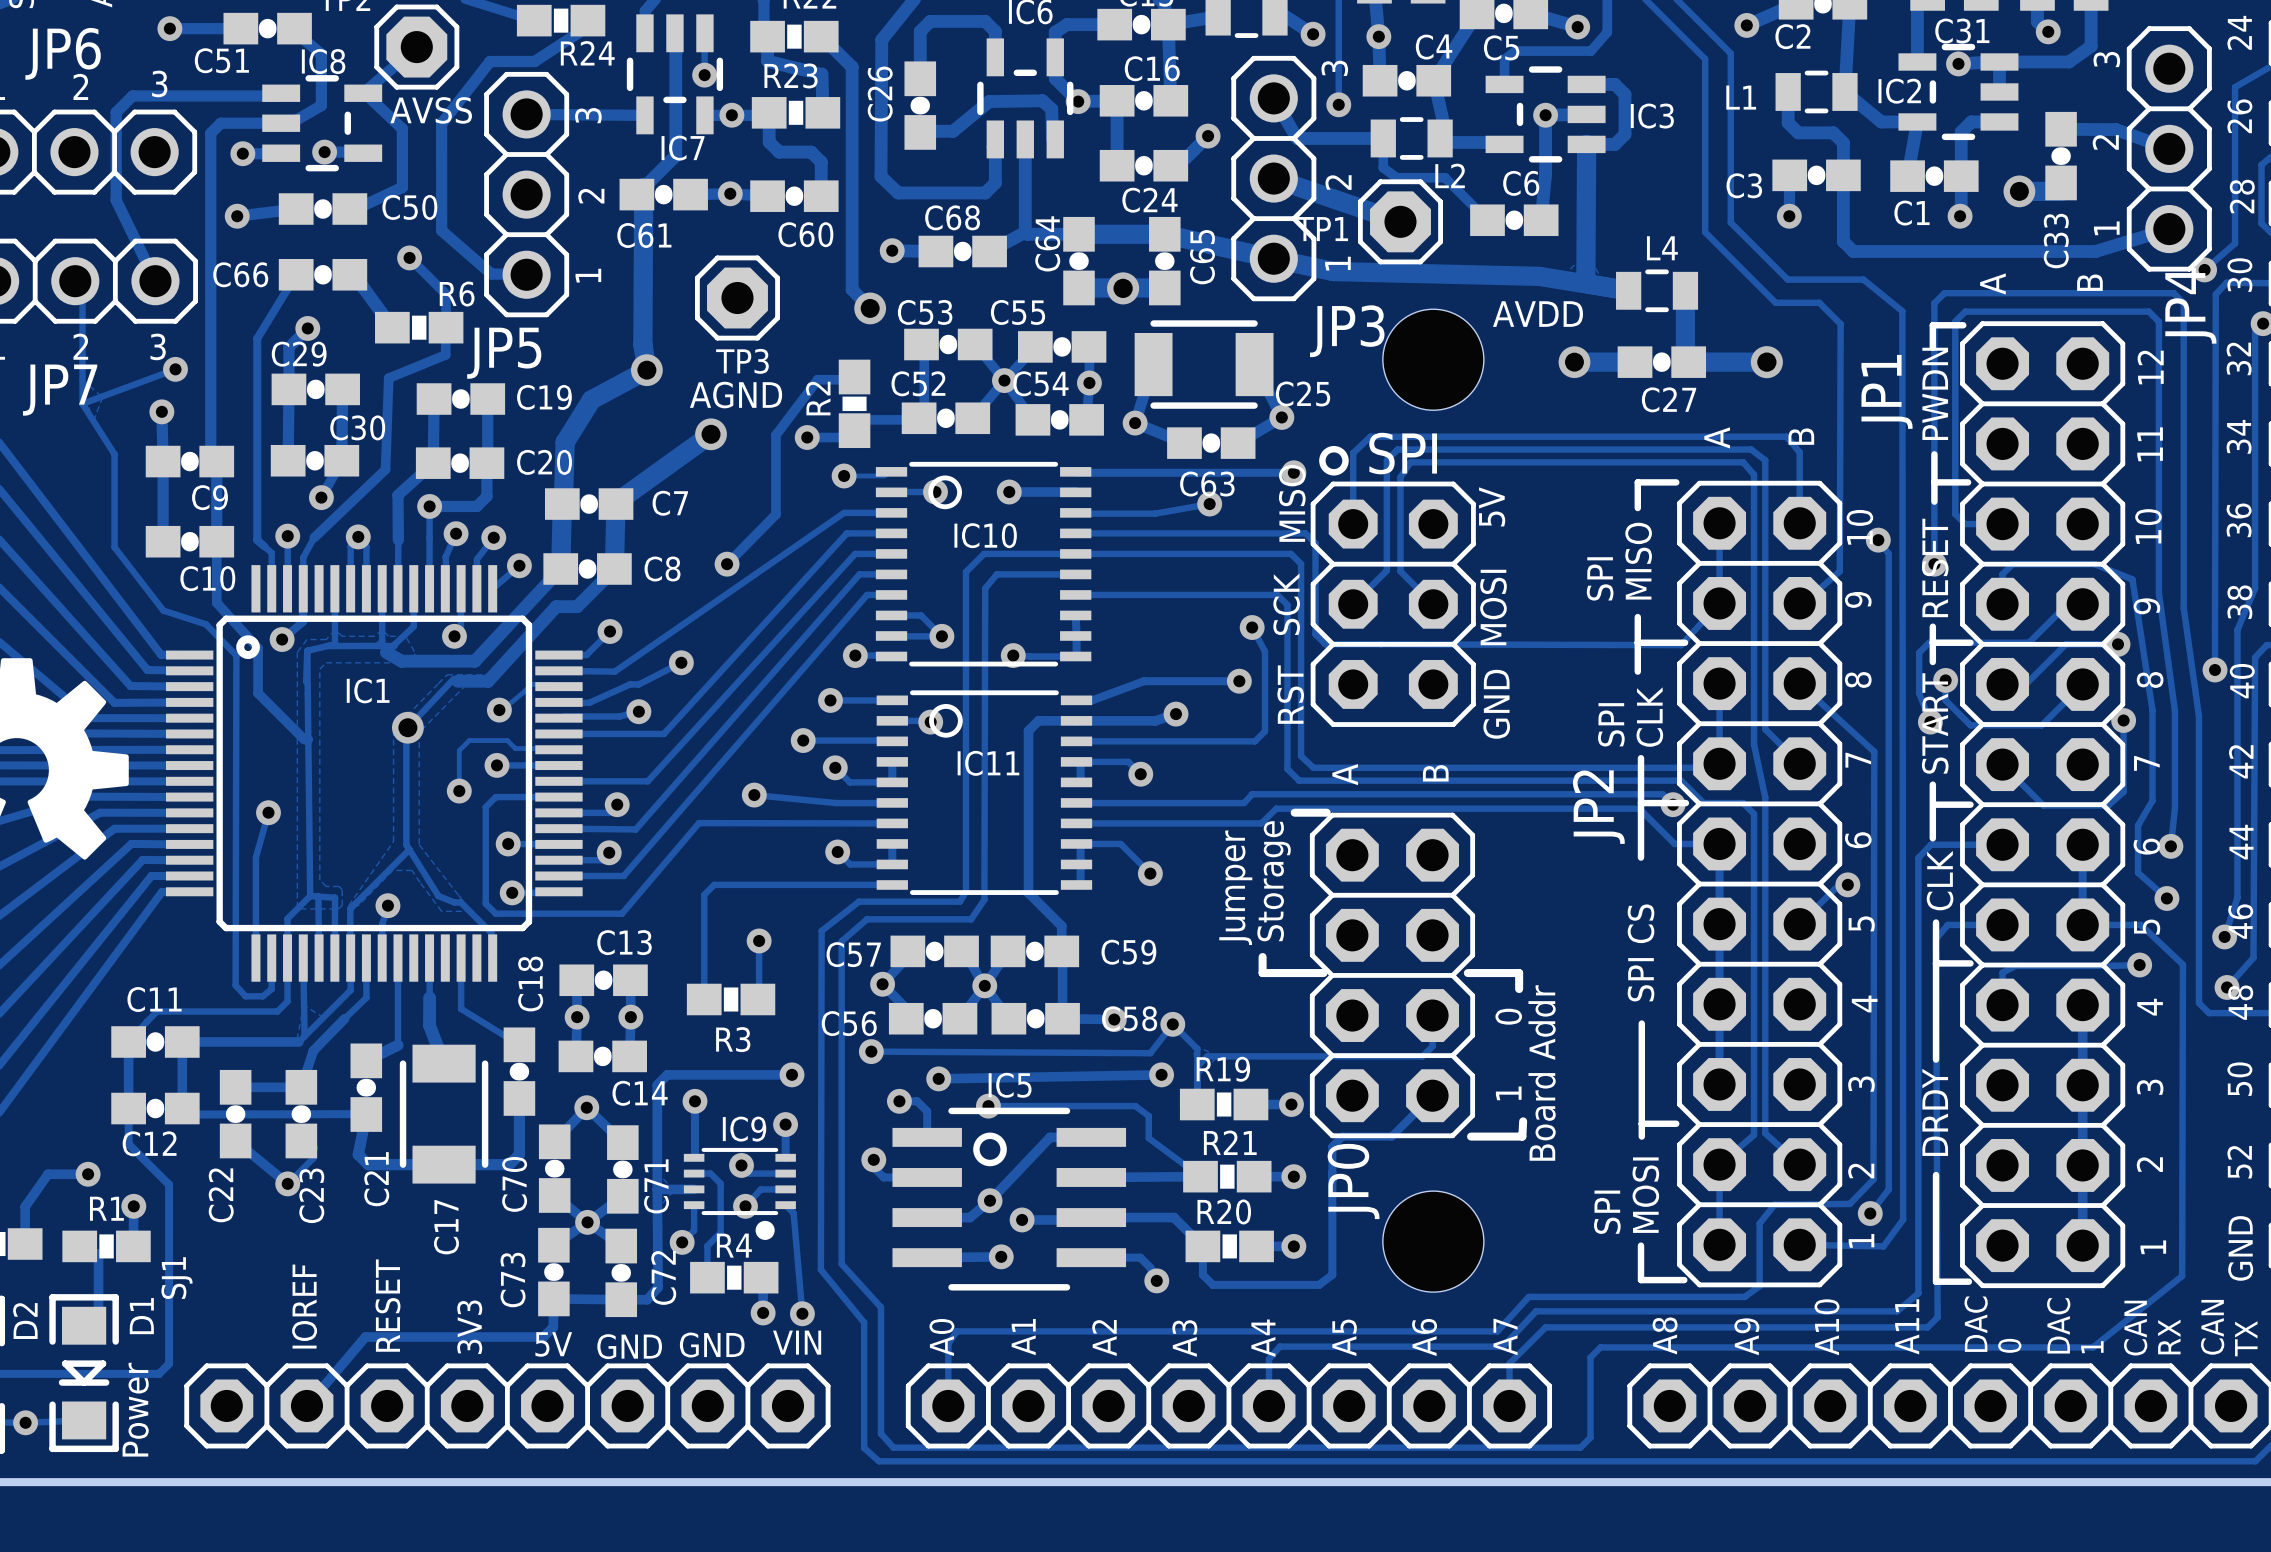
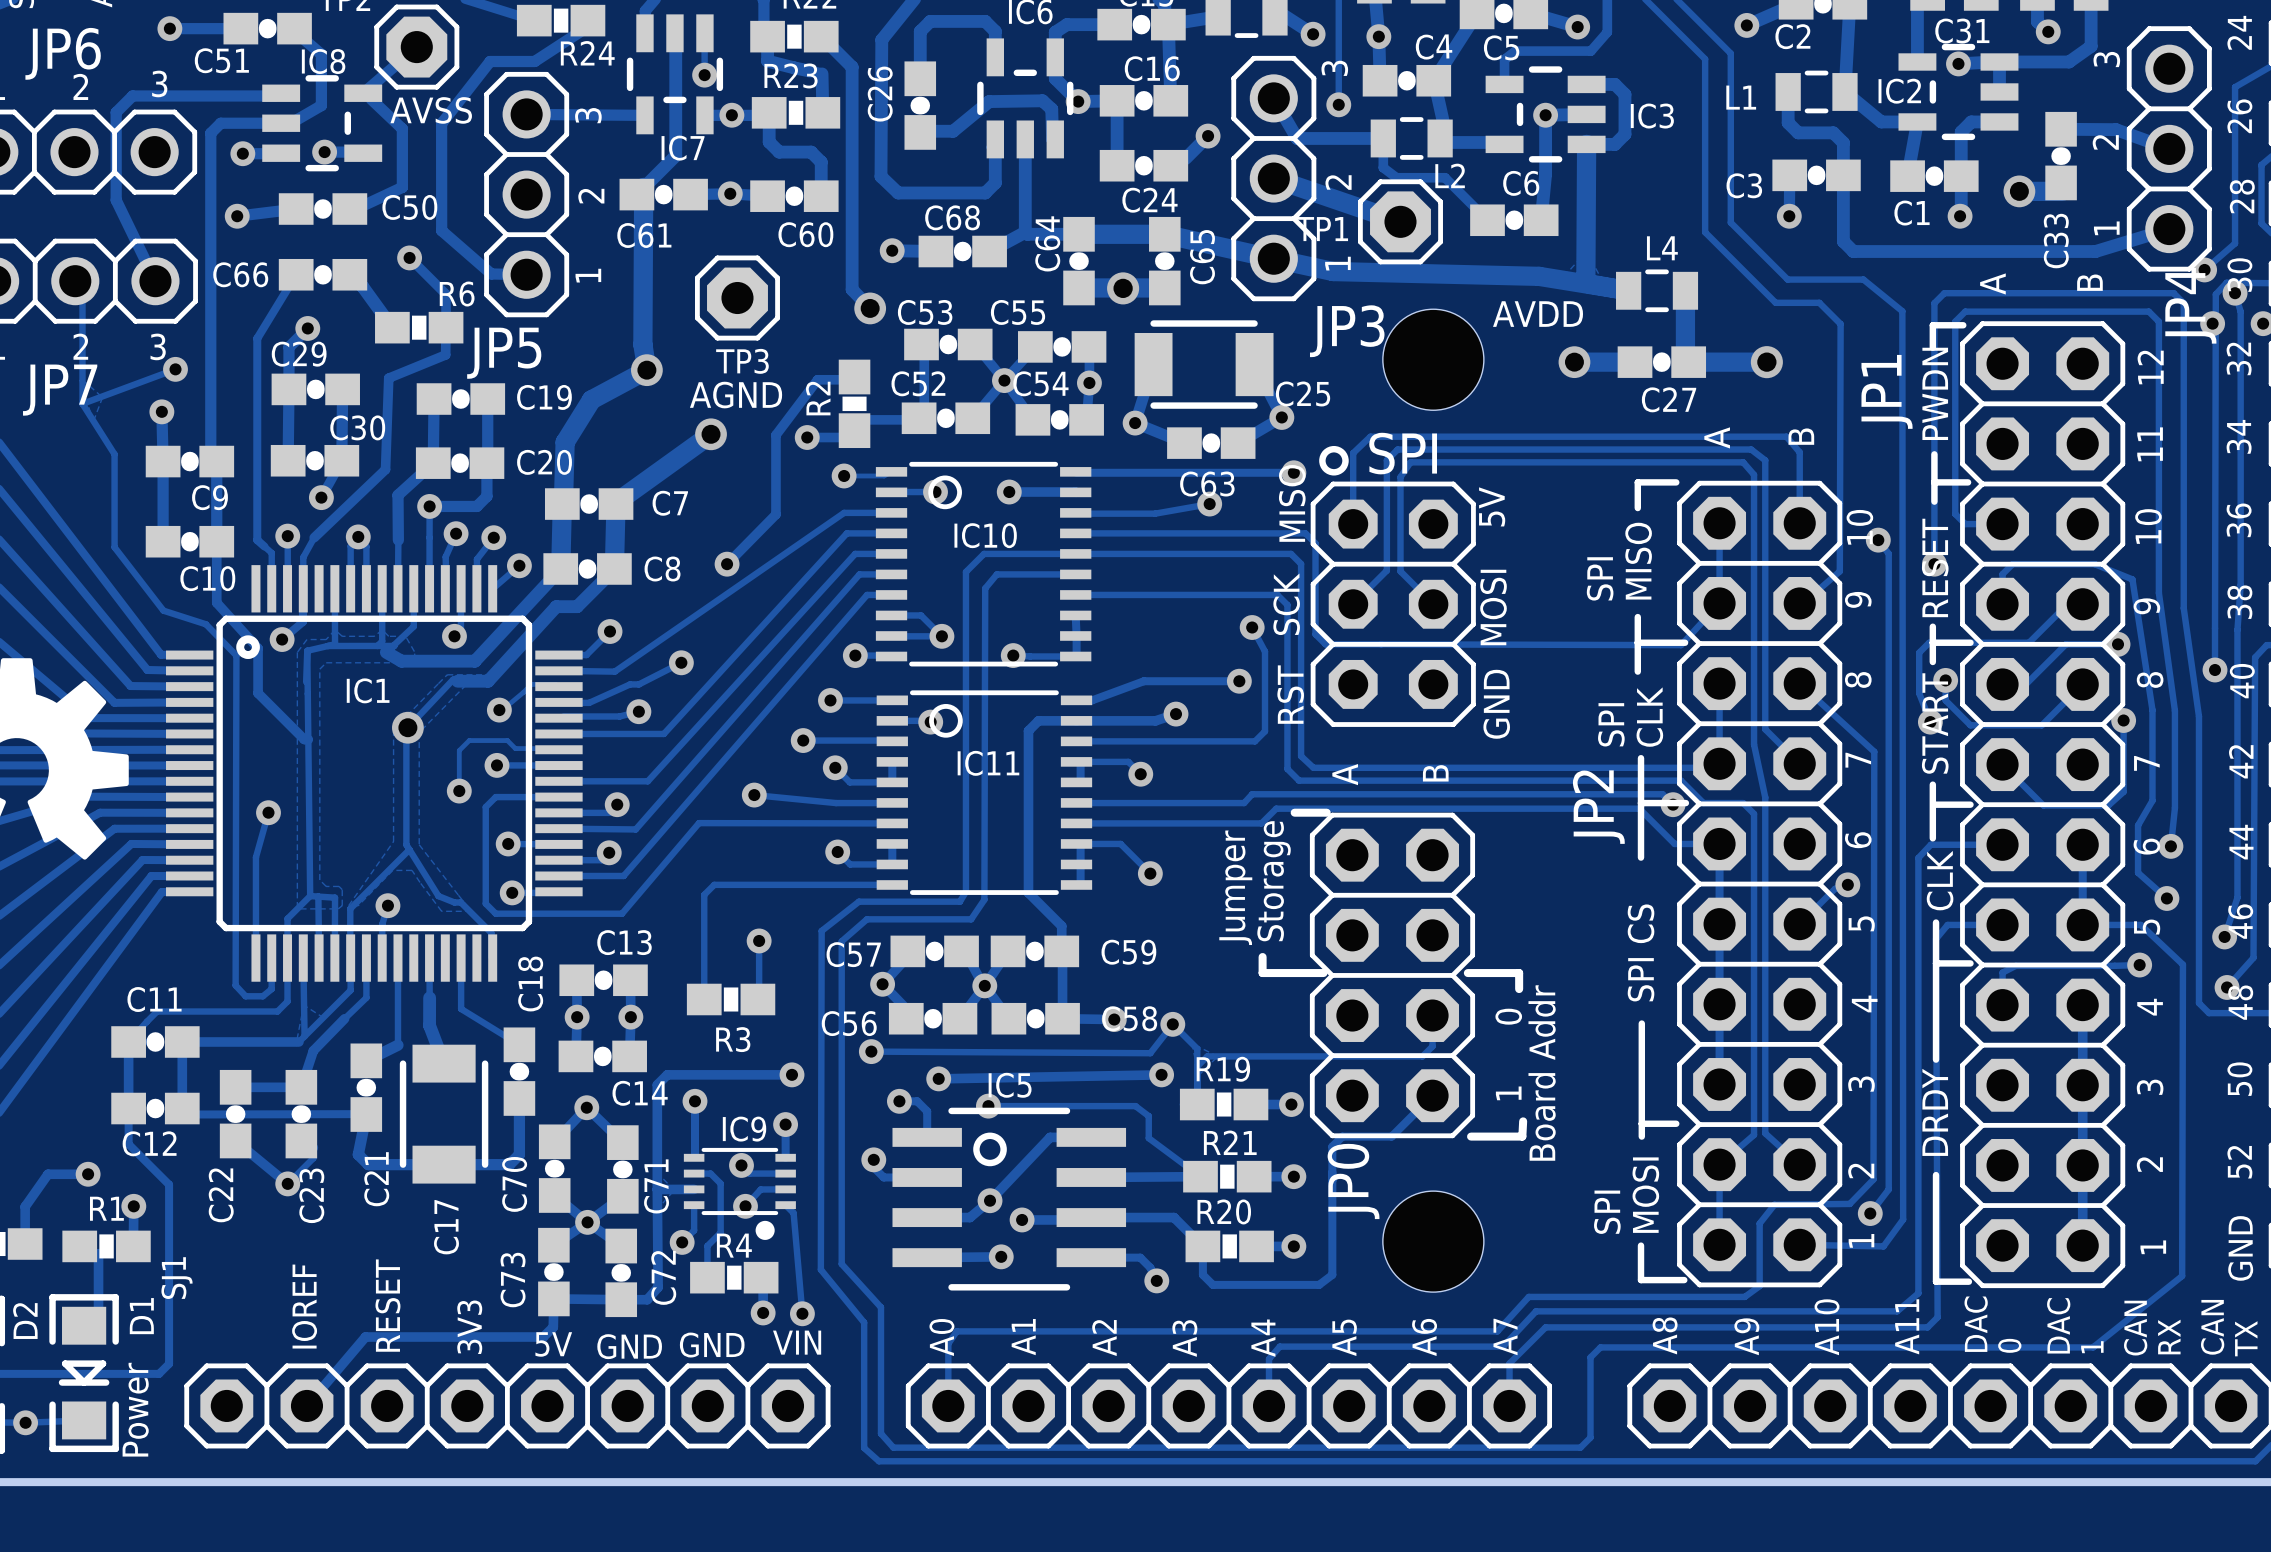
via: none -> (2235, 293)
via: none -> (2212, 323)
track: (2263, 323) (2255, 331) (2255, 588) (2237, 629) -> (2235, 293) (2240, 311) (2240, 585) (2237, 629)

